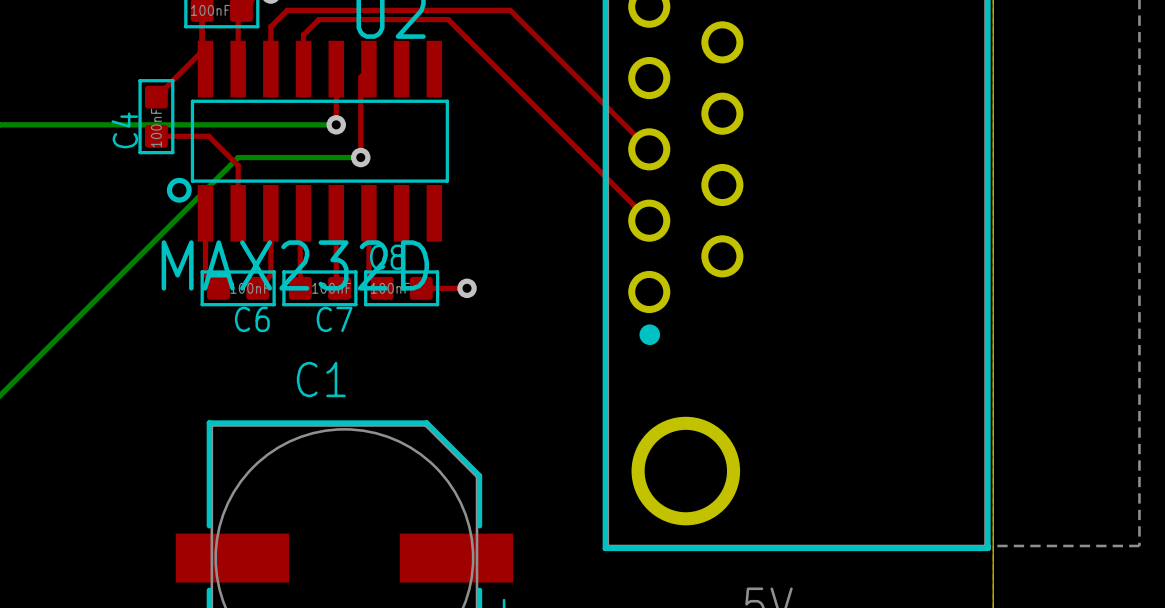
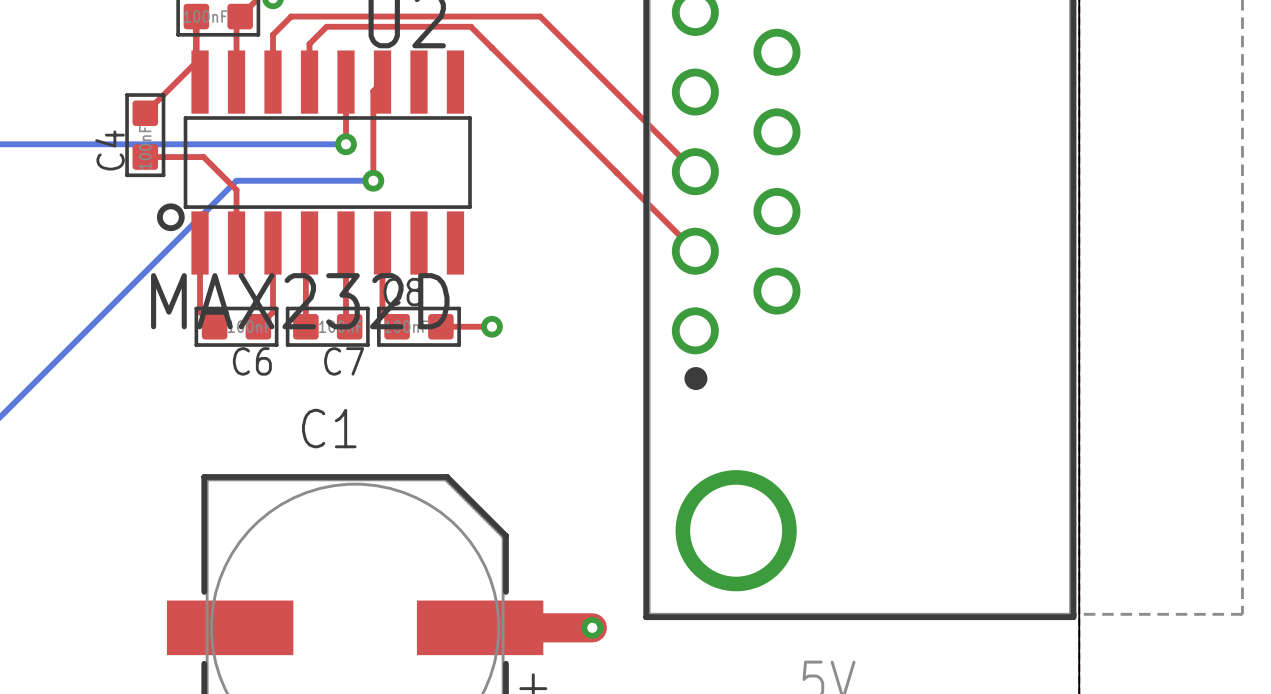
top track: none -> (519, 627) (592, 627)
via: none -> (592, 627)

